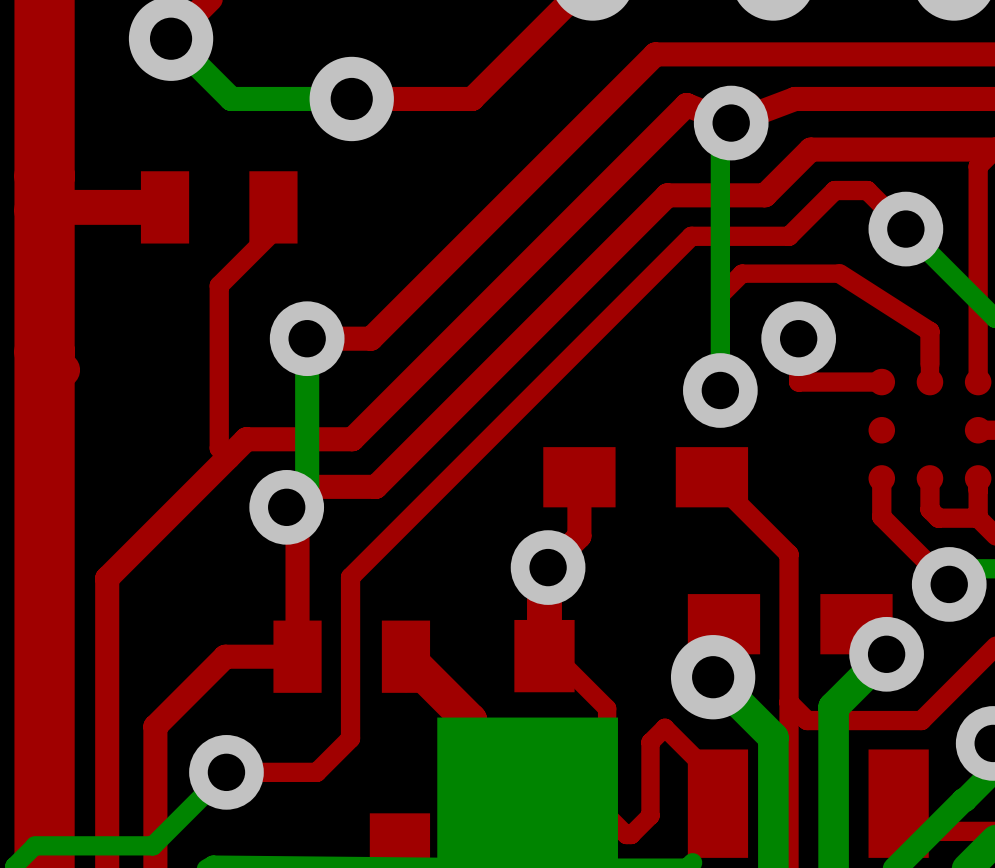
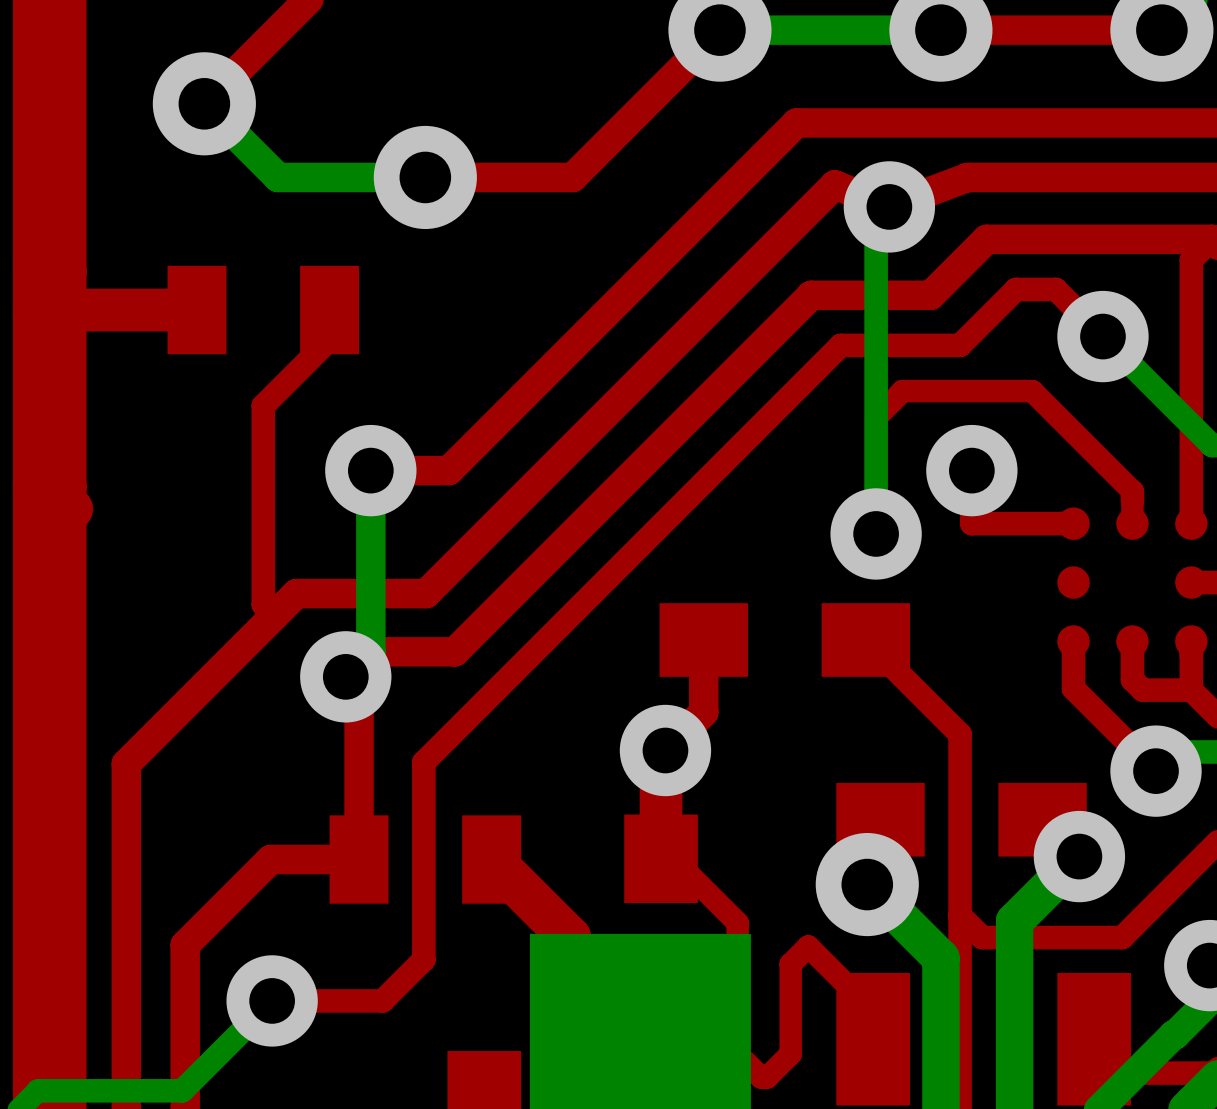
top track: (839, 273) (929, 331) (929, 355) -> (1021, 391) (1032, 391) (1132, 491)

